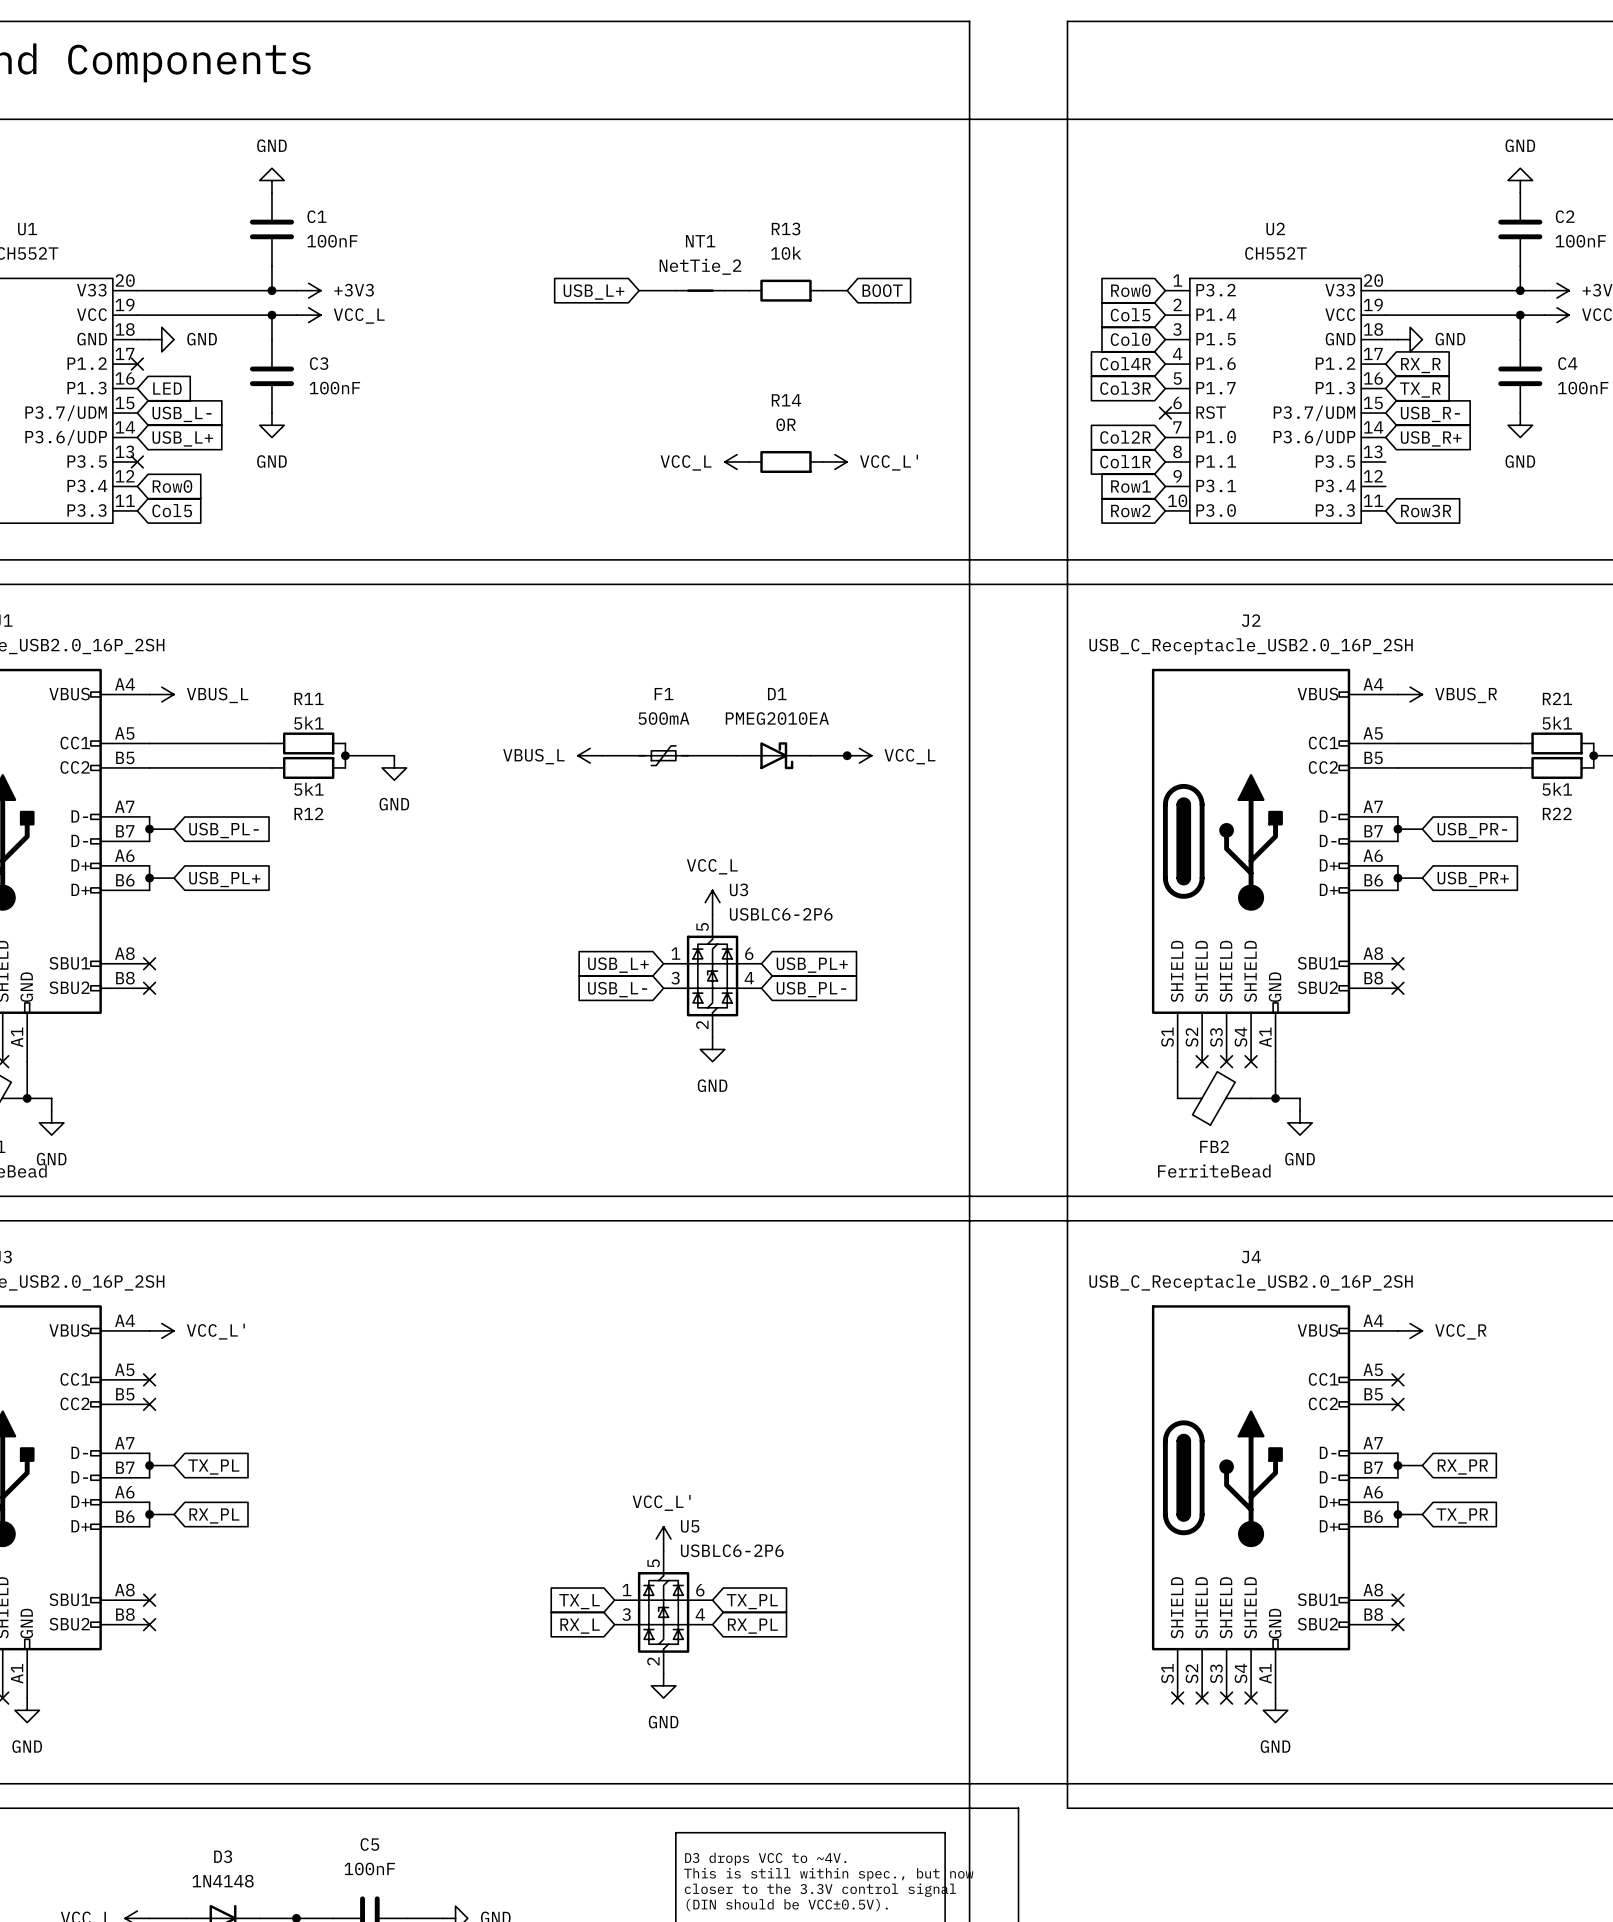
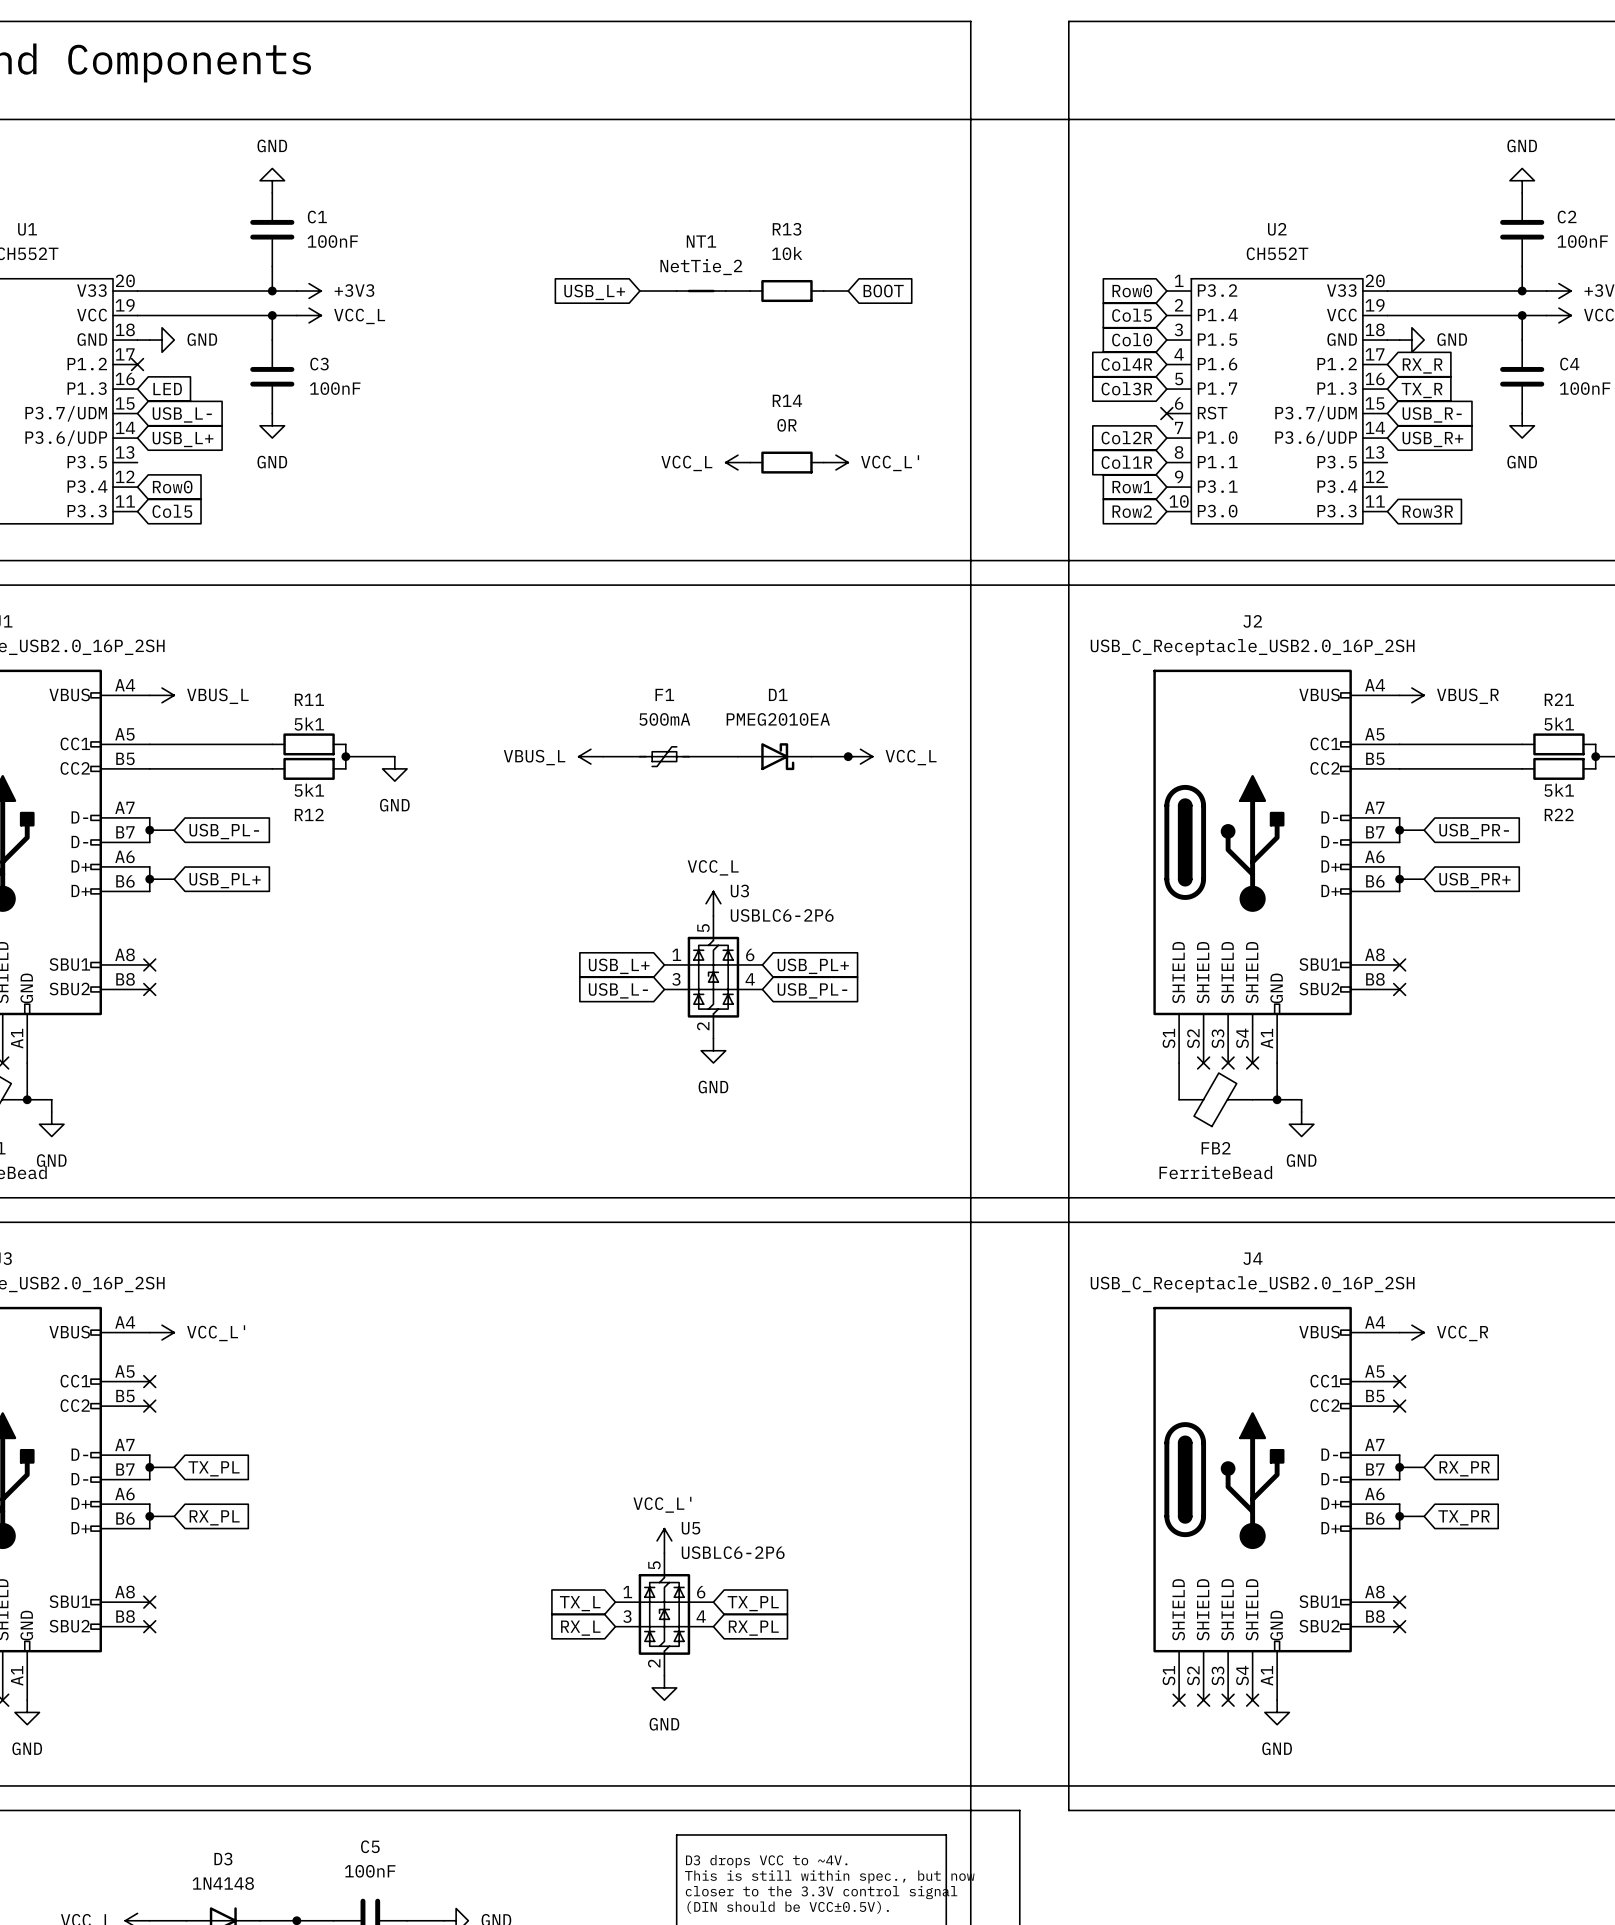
no-connect mark: (137, 461) -> none

